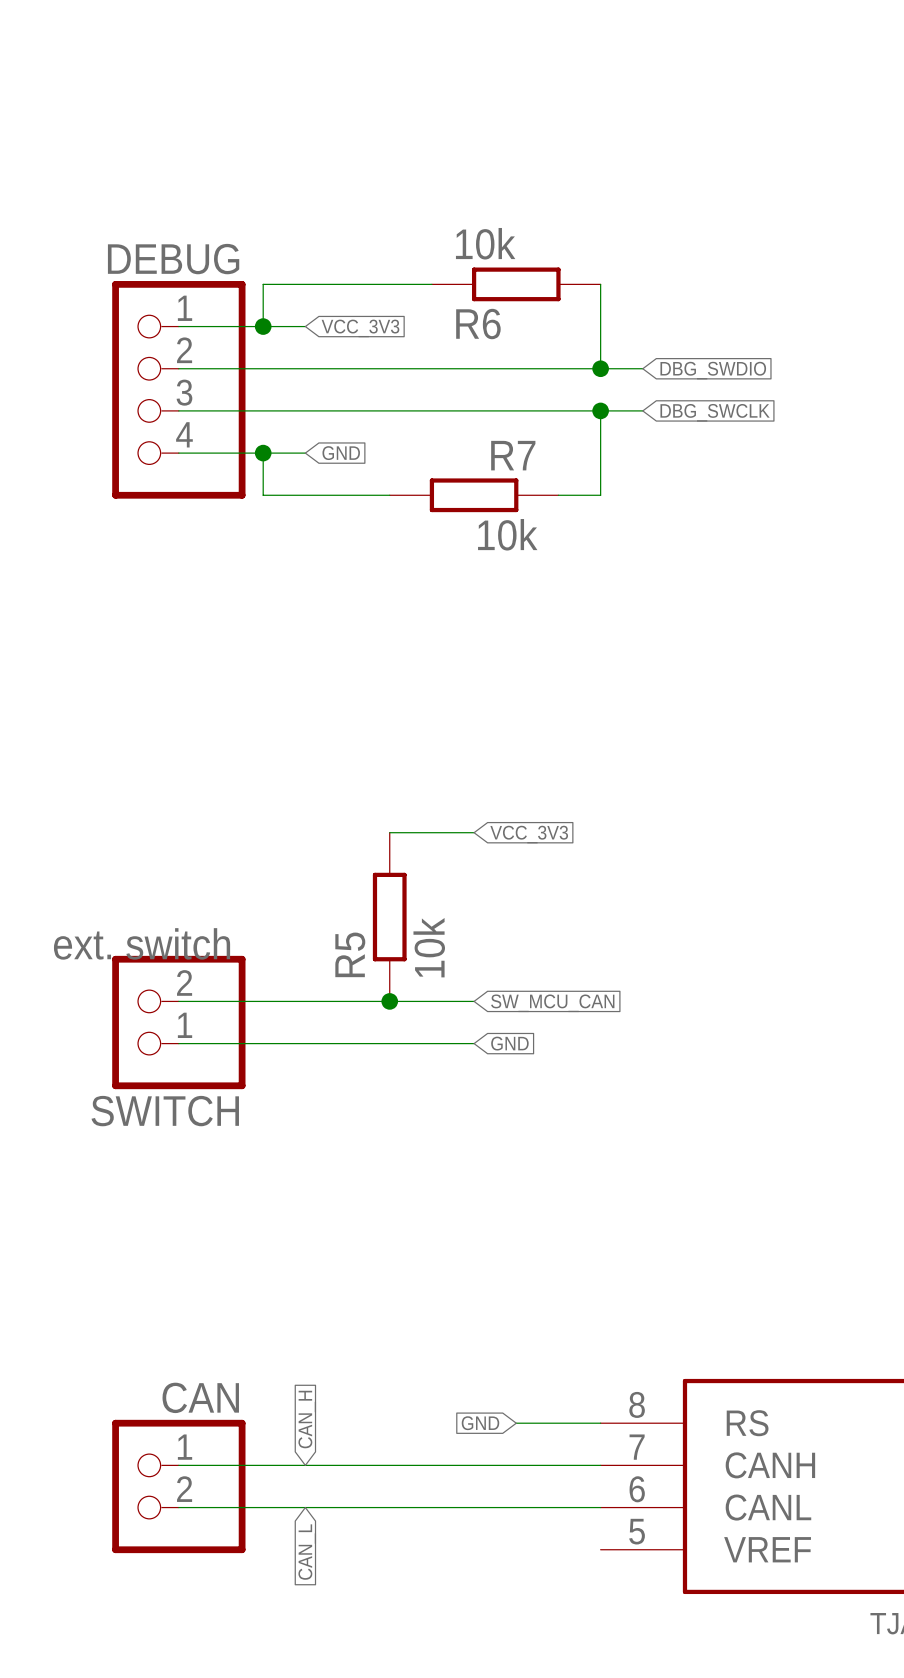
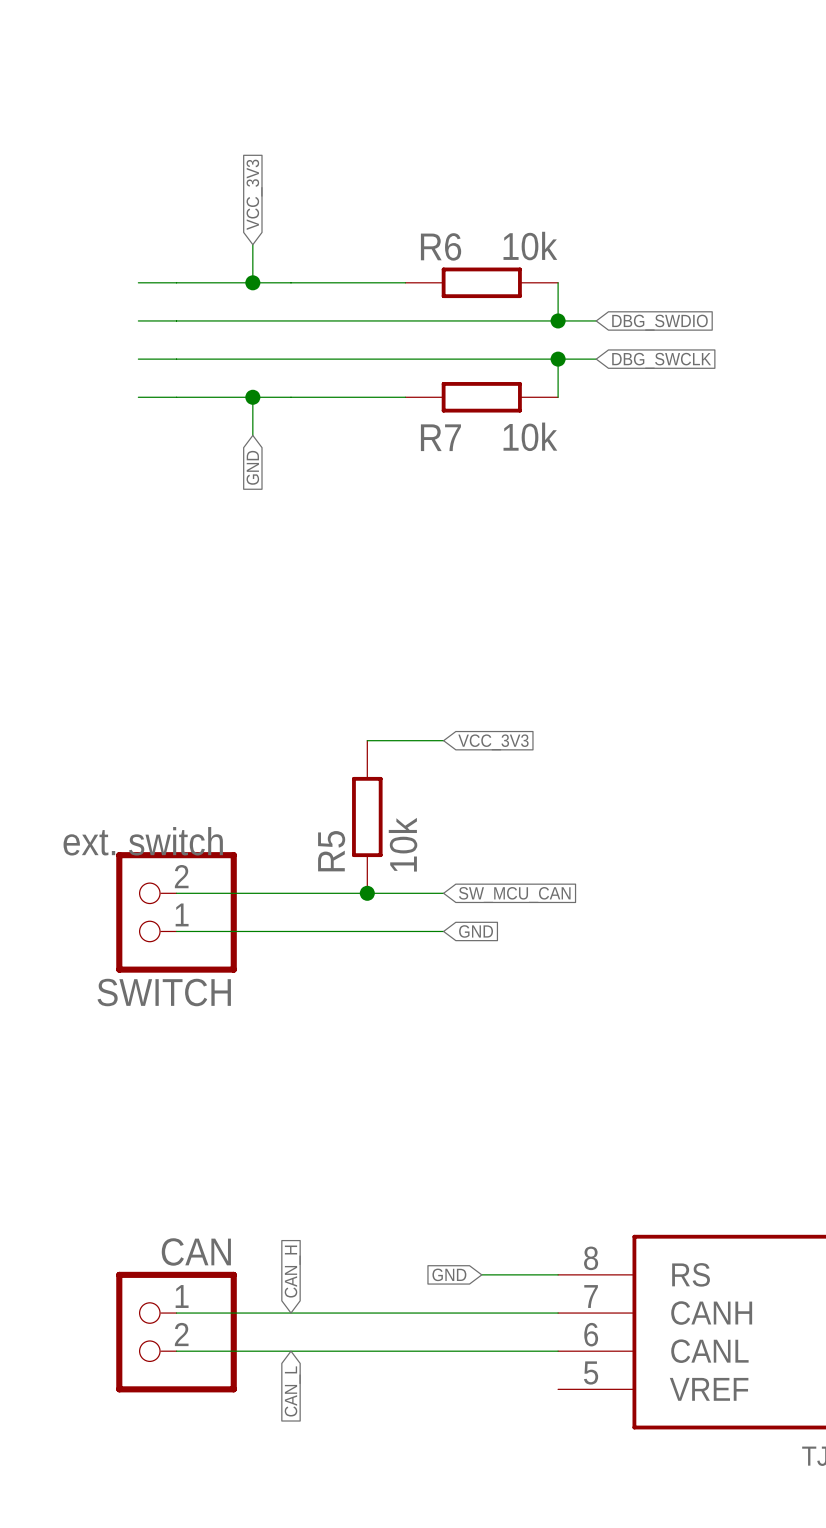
R6 value position: 10k (485, 243) -> 10k (530, 246)
wire: (263, 284) (431, 284) -> none
R6 position: (516, 284) -> (481, 282)
wire: (600, 284) (600, 326) -> none
R6 name position: R6 (478, 324) -> R6 (441, 246)
wire: none -> (138, 282) (176, 282)
wire: none -> (291, 282) (405, 282)
global label rotation: 0° (360, 328) -> 90° counterclockwise (254, 194)
global label position: VCC_3V3 (360, 328) -> VCC_3V3 (254, 194)
wire: none -> (138, 320) (176, 320)
DEBUG: (178, 389) -> none
wire: none -> (138, 359) (176, 359)
wire: none -> (138, 397) (176, 397)
global label rotation: 0° (341, 453) -> 90° clockwise (252, 467)
global label position: GND (341, 453) -> GND (252, 467)
wire: (600, 453) (600, 495) (558, 495) -> none
R7 name position: R7 (513, 455) -> R7 (440, 437)
wire: (263, 495) (389, 495) -> (291, 397) (405, 397)
R7 position: (474, 495) -> (481, 397)
R7 value position: 10k (507, 534) -> 10k (530, 436)

